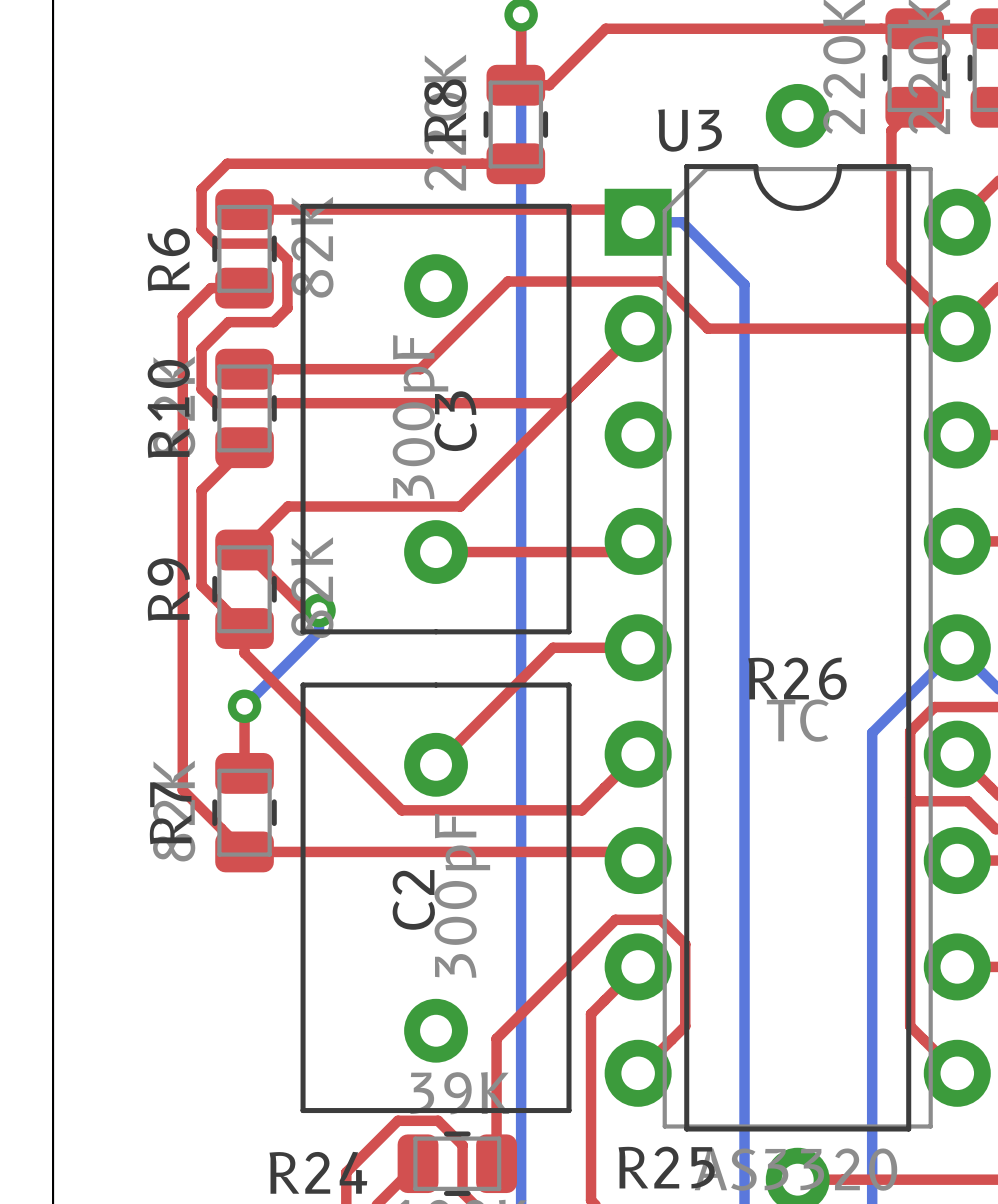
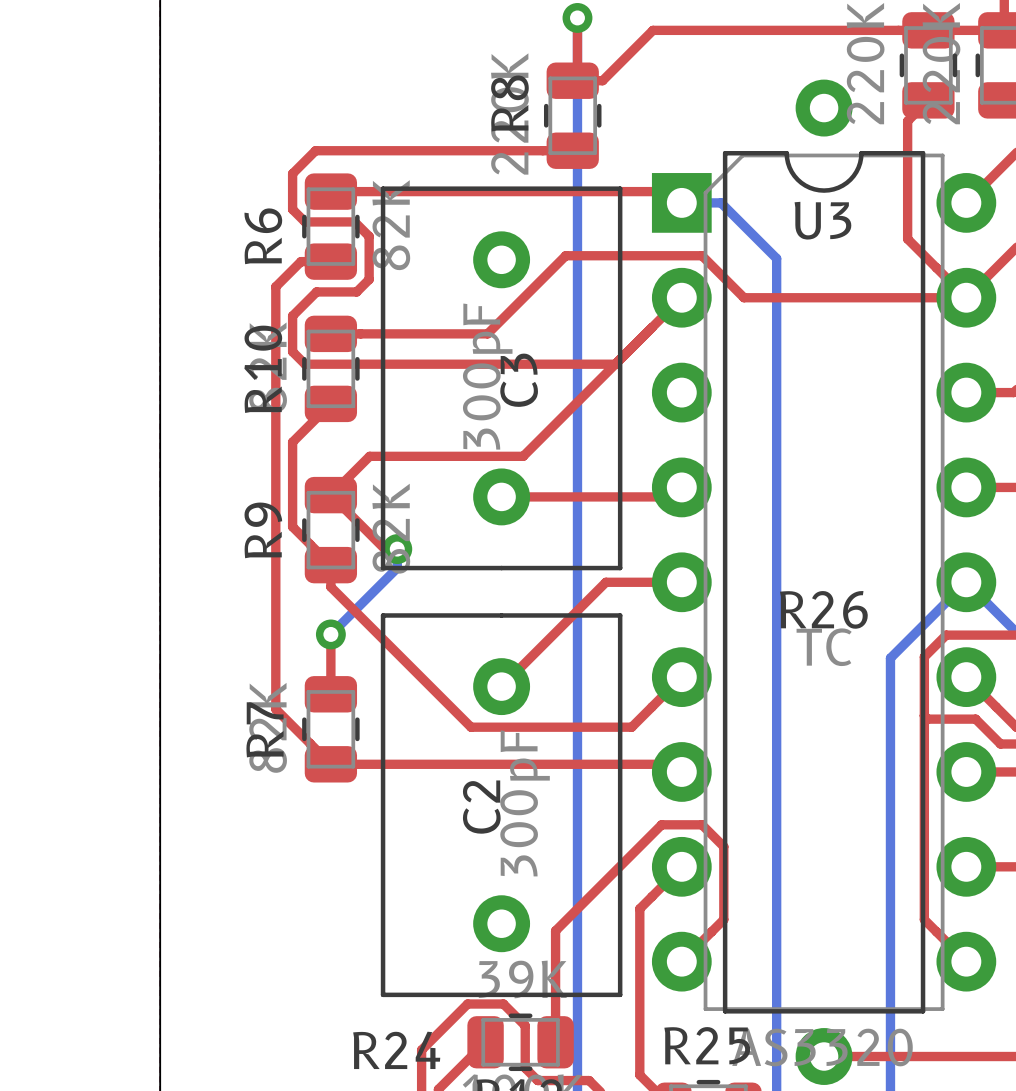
U3 name position: U3 (690, 130) -> U3 (822, 220)

